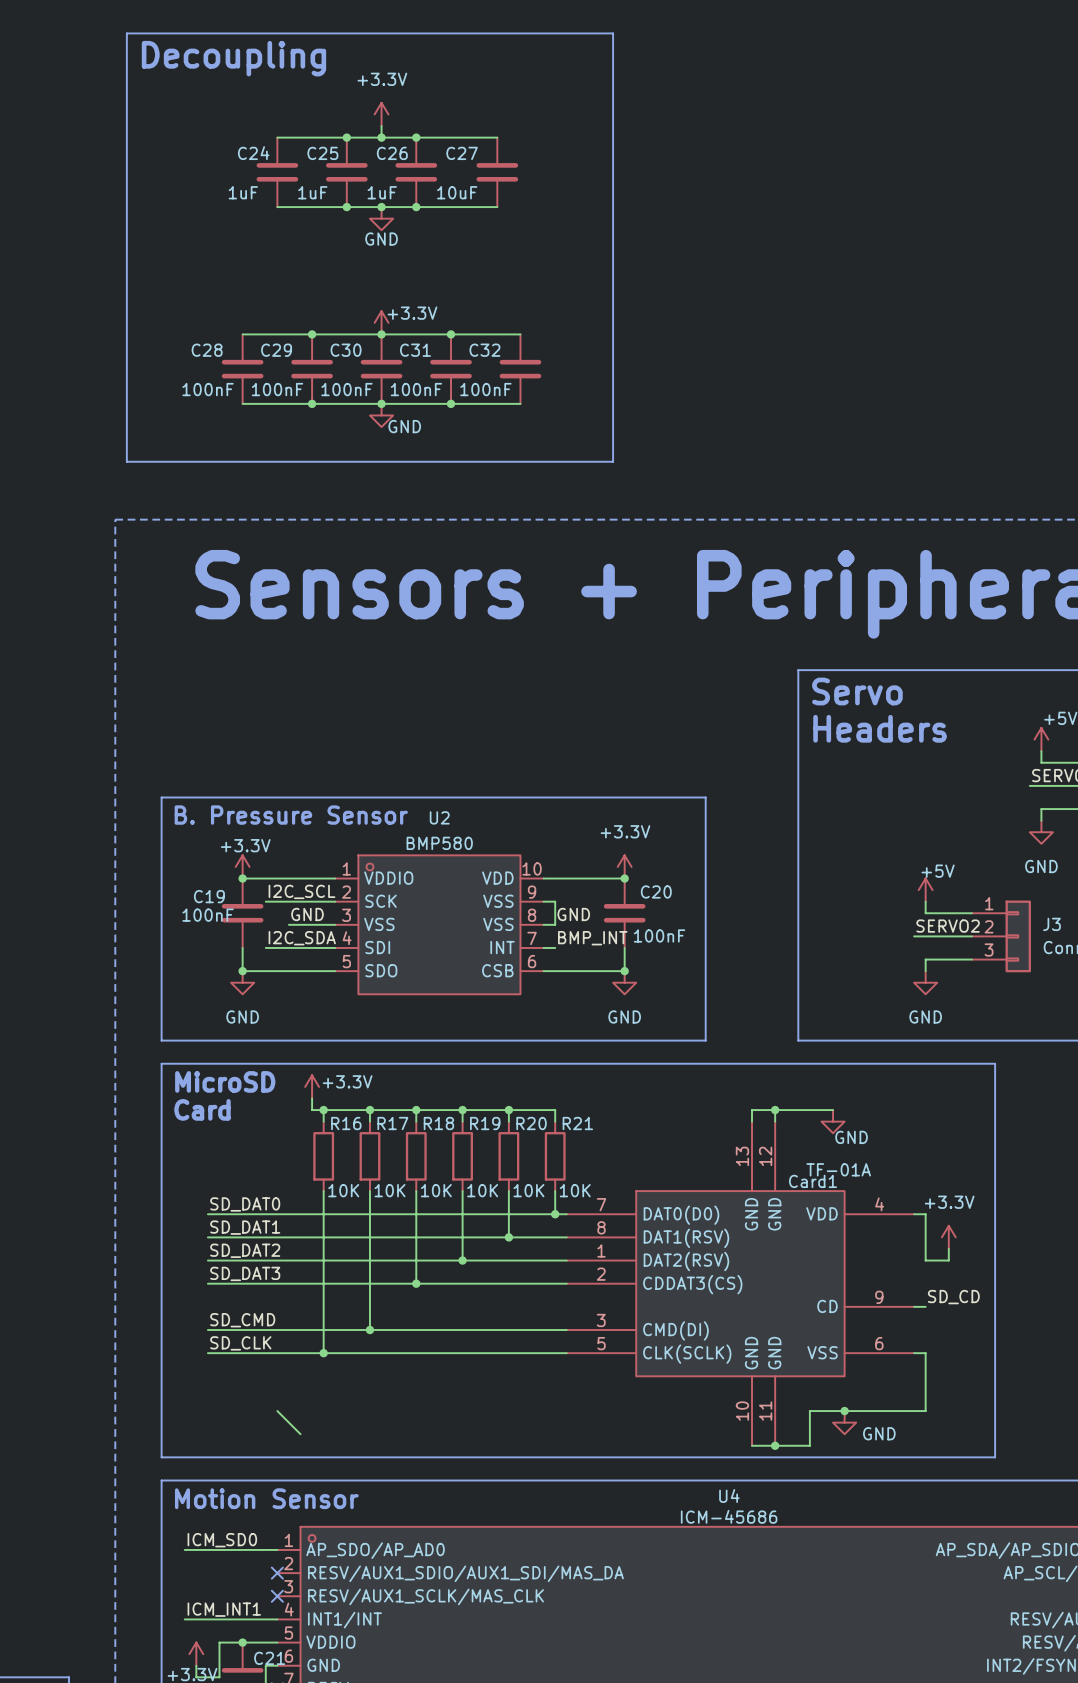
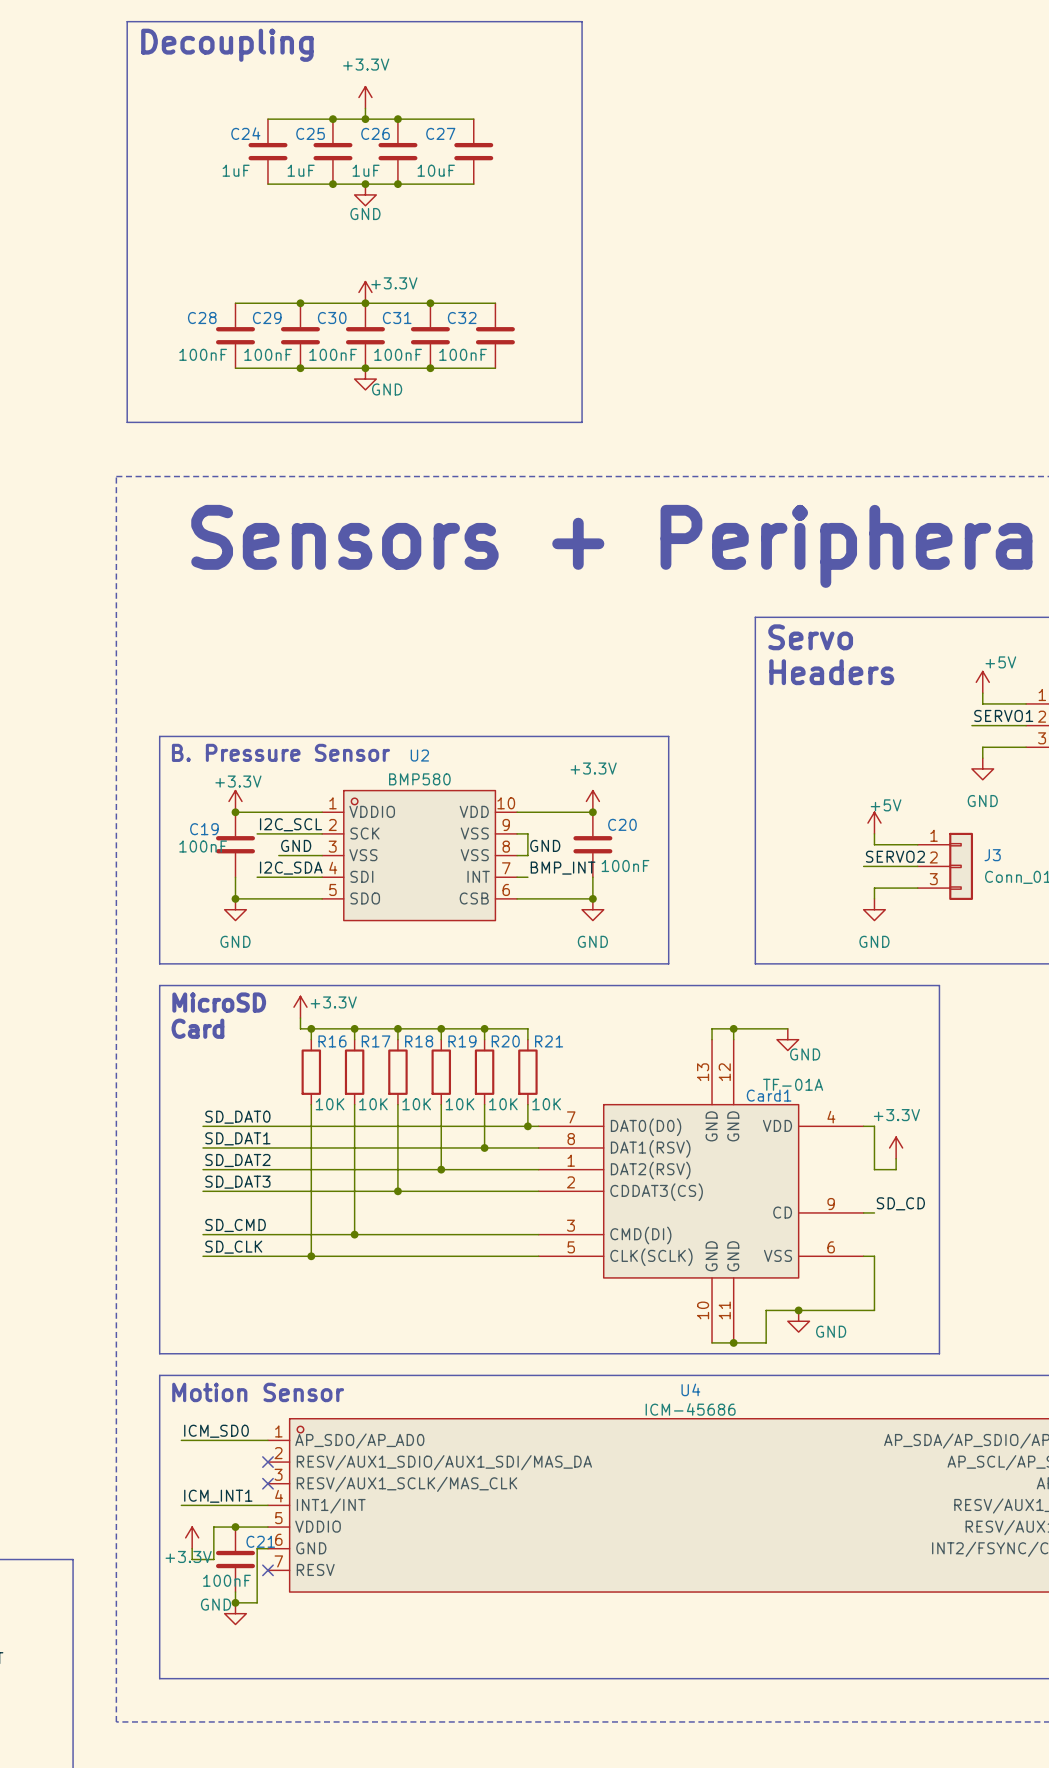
wire: (277, 1411) (300, 1434) -> none

